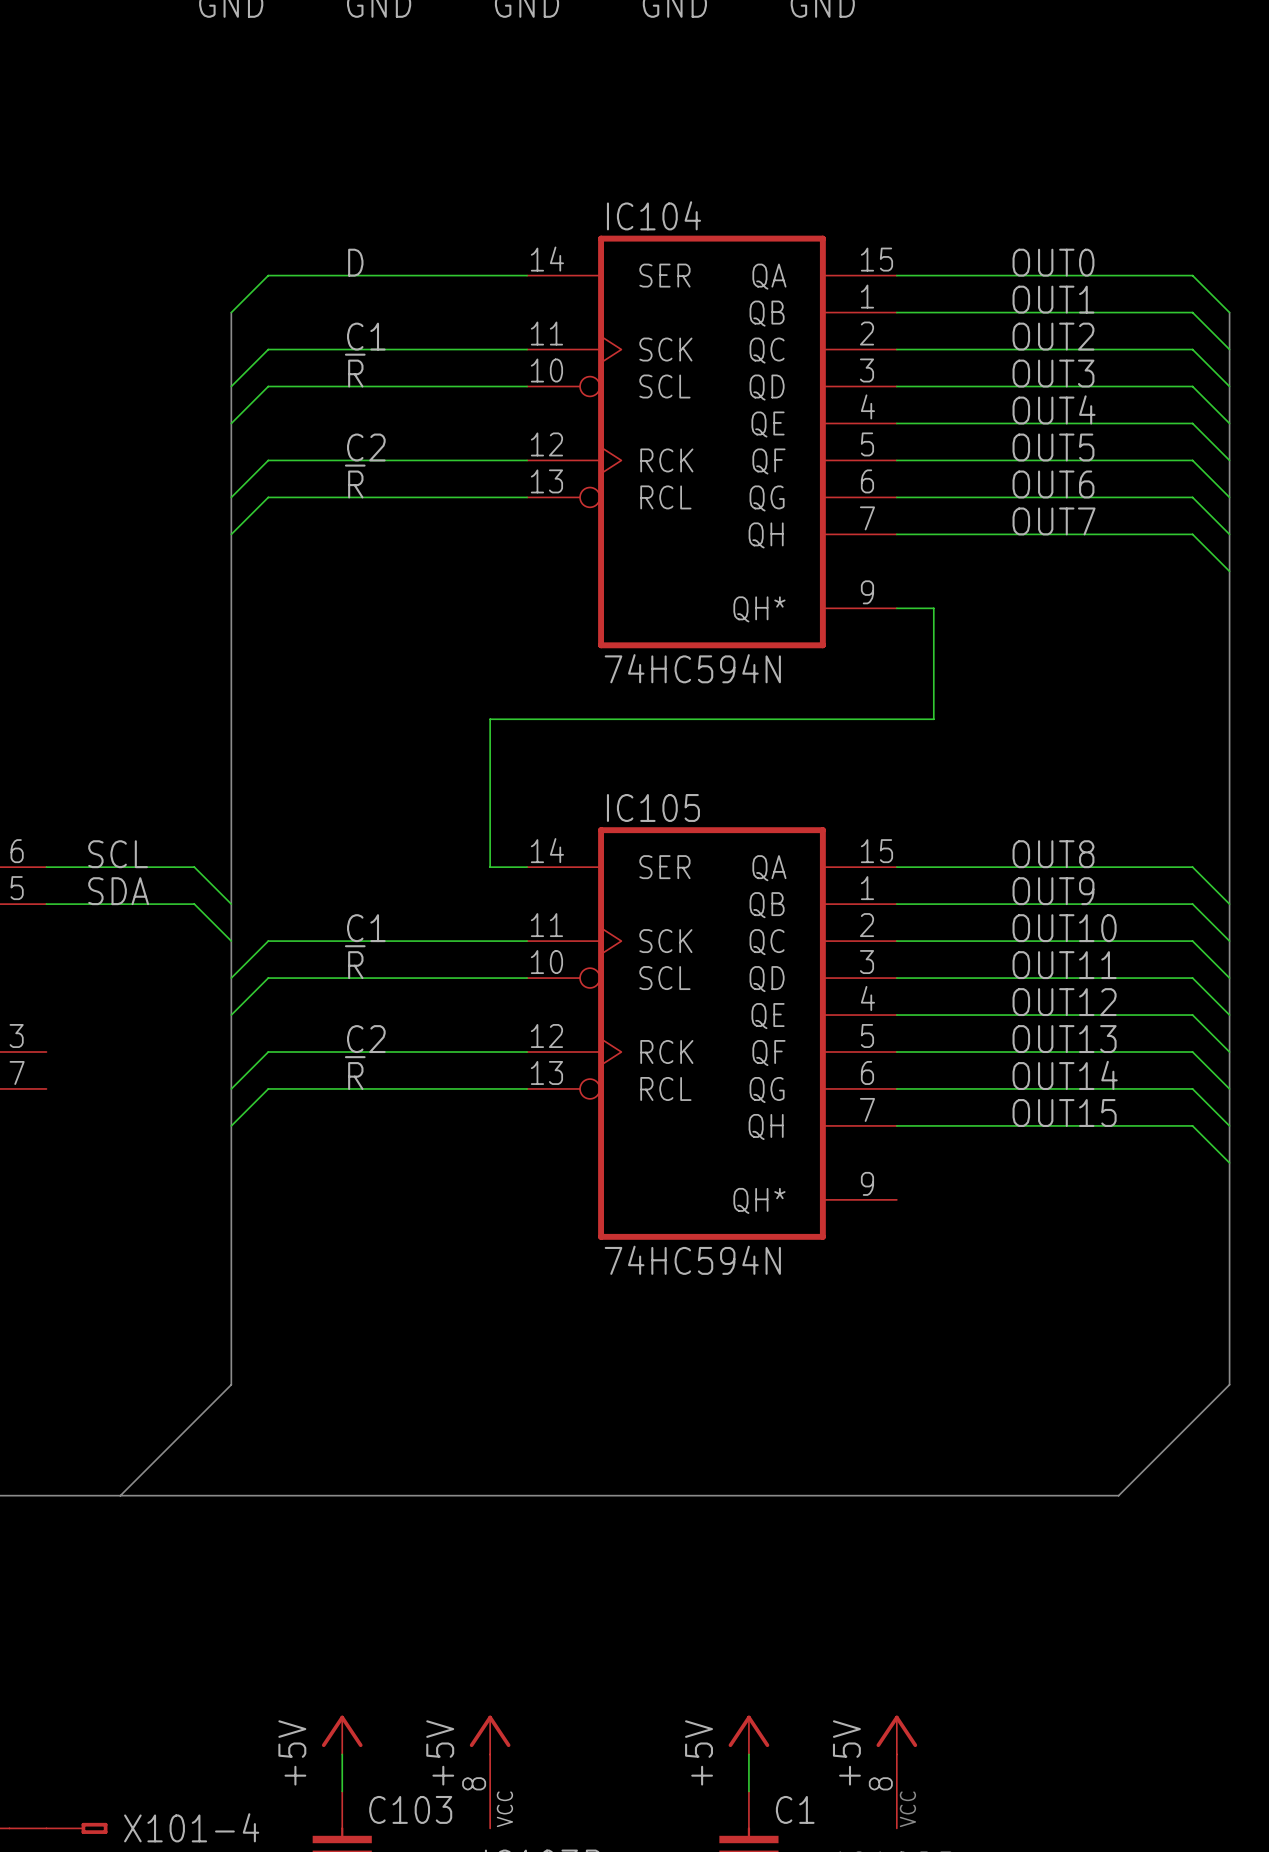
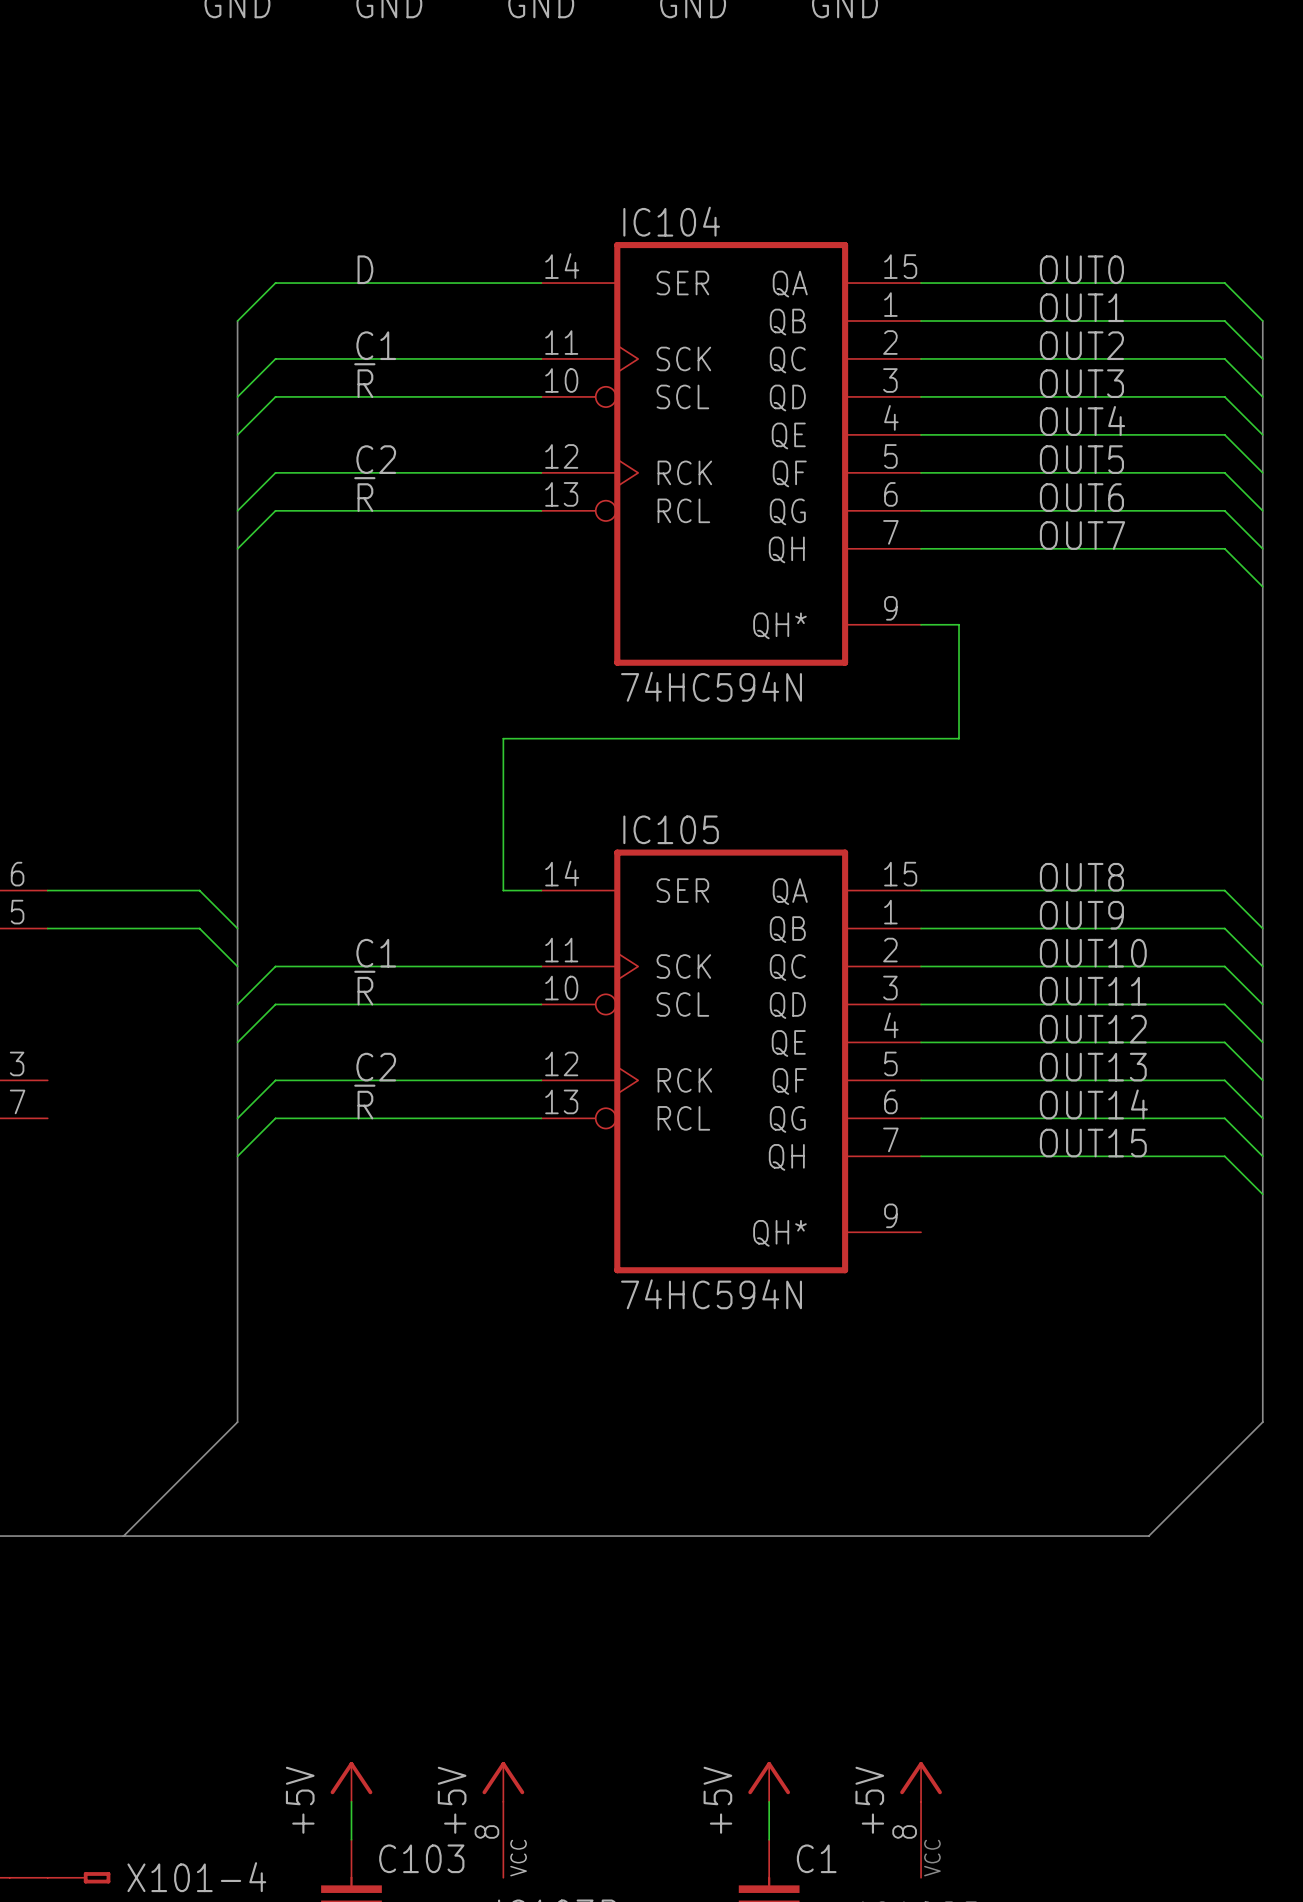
label: SCL (118, 854) -> none
label: SDA (118, 891) -> none

